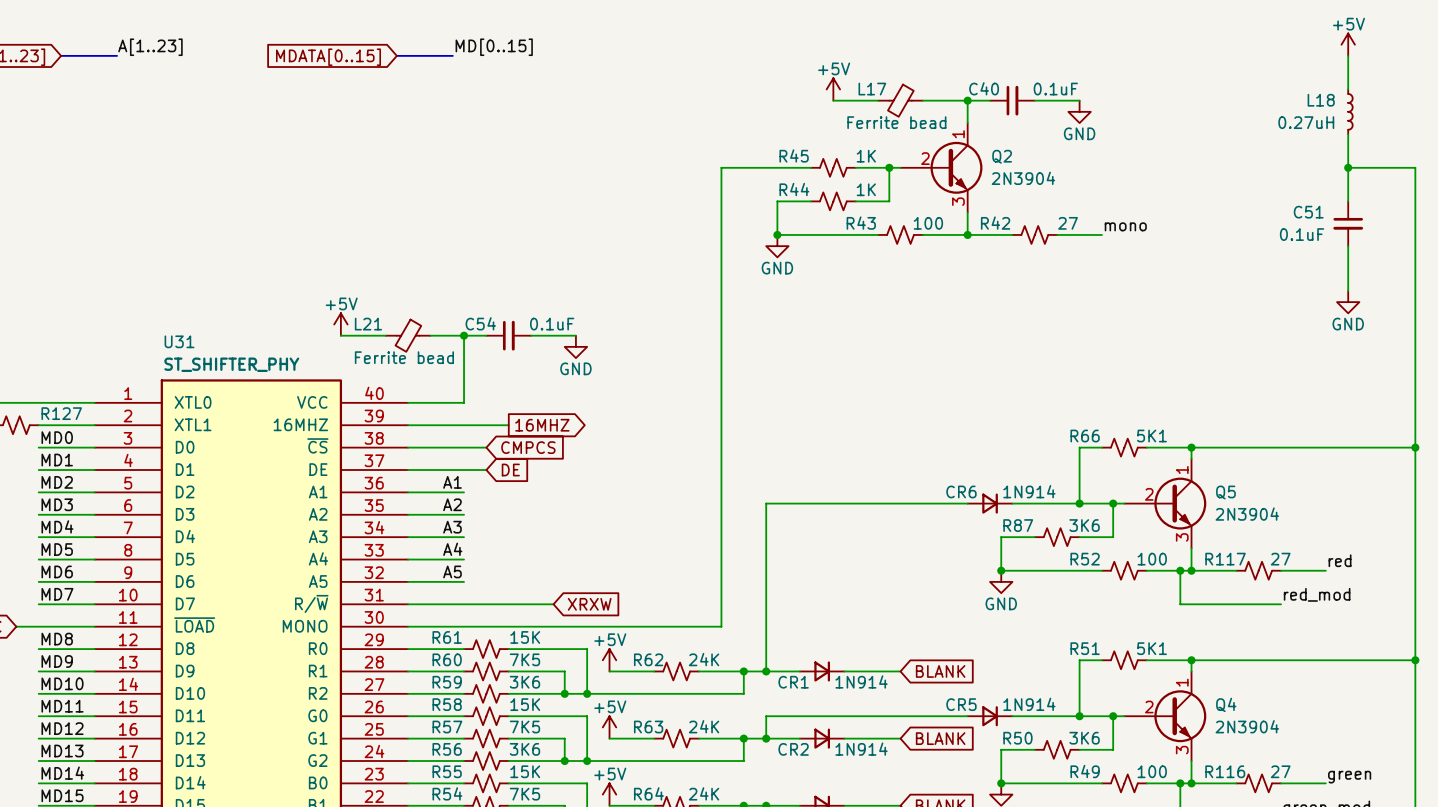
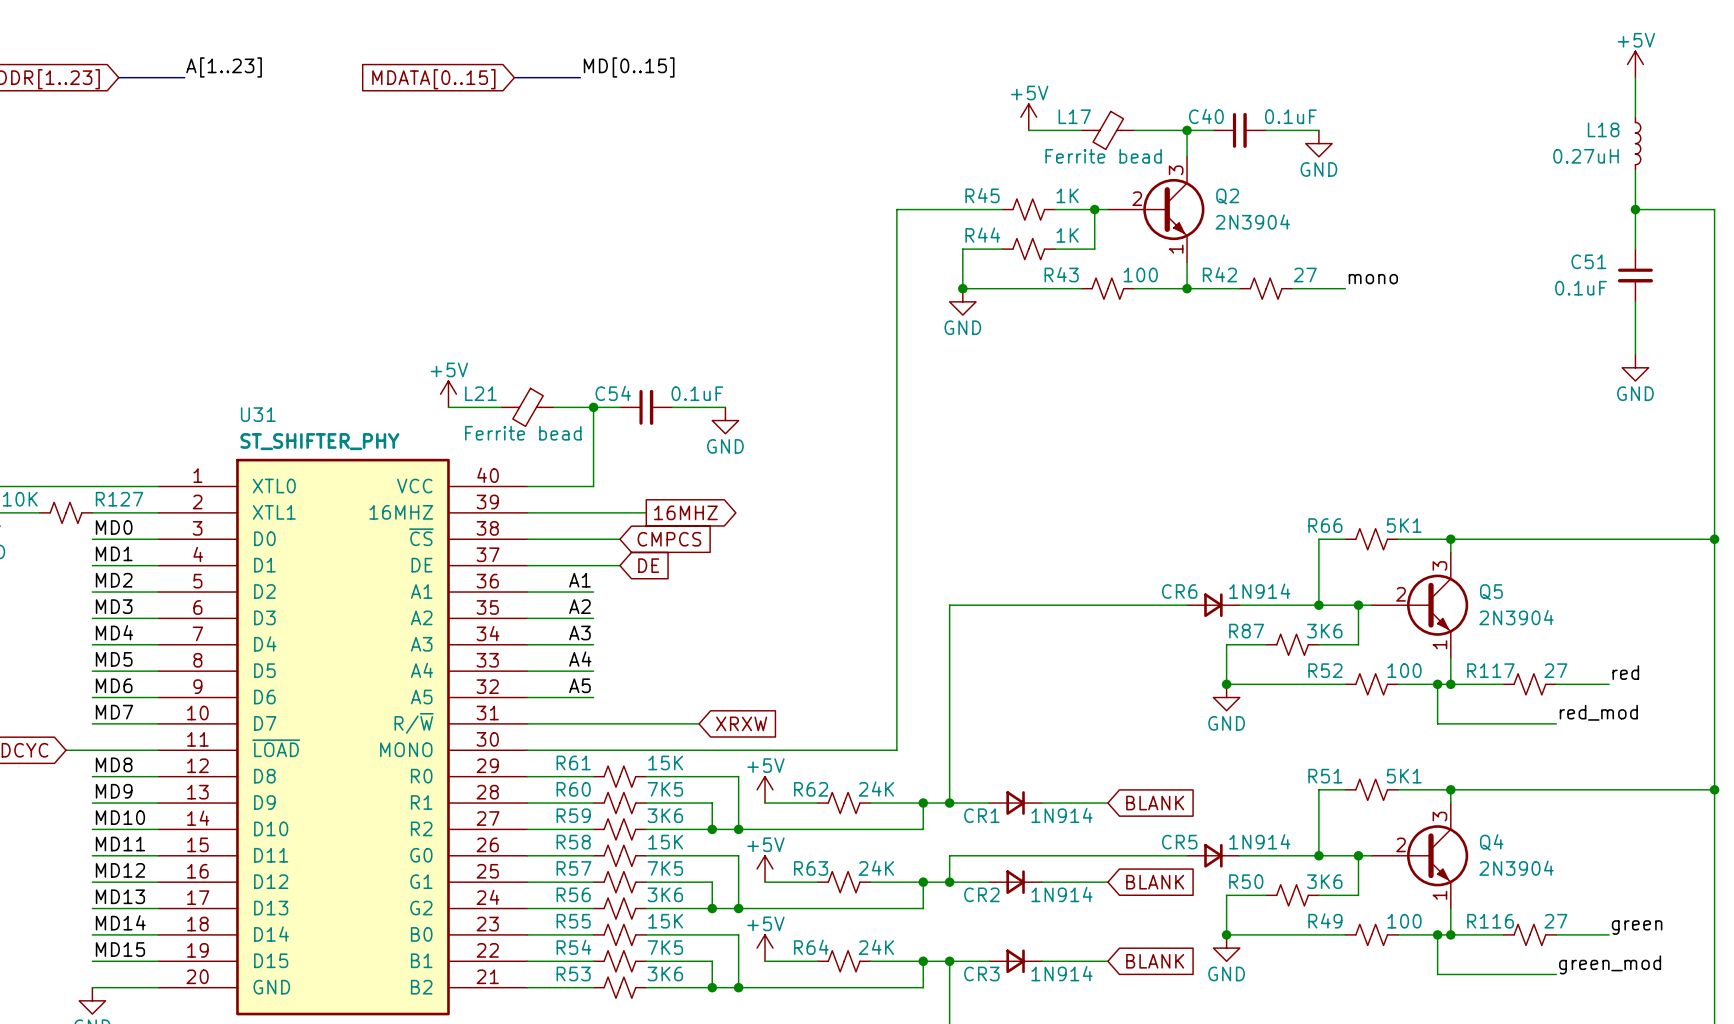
Q2 pin number: 1 (958, 134) -> 3 (1176, 170)
Q2 pin number: 3 (958, 201) -> 1 (1176, 249)
Q5 pin number: 1 (1182, 470) -> 3 (1439, 565)
Q5 pin number: 3 (1182, 537) -> 1 (1439, 644)
Q4 pin number: 1 (1182, 682) -> 3 (1439, 816)
Q4 pin number: 3 (1182, 750) -> 1 (1439, 895)

